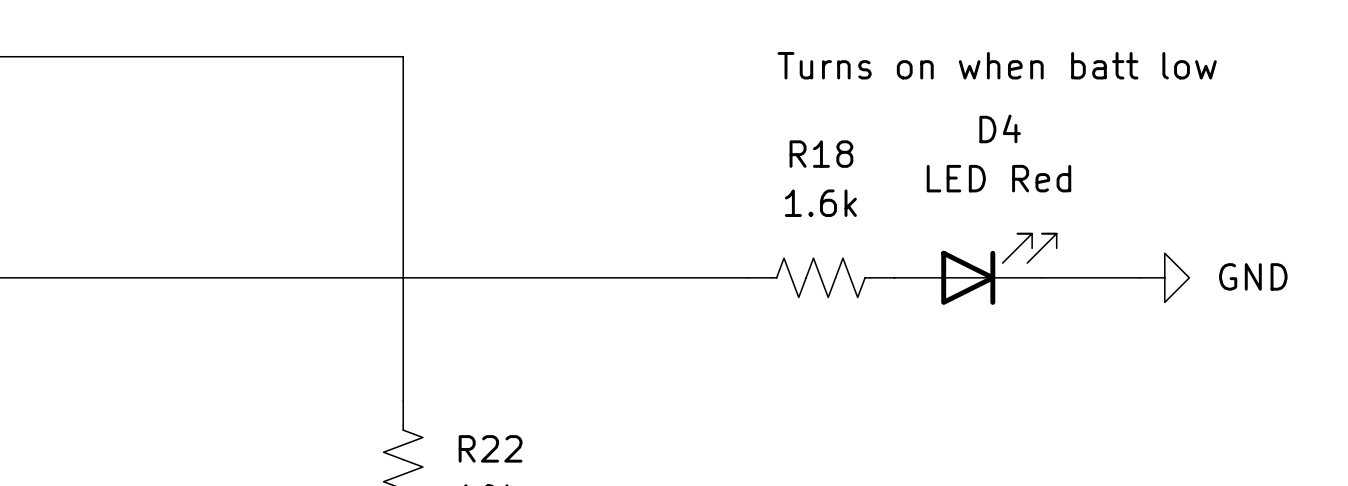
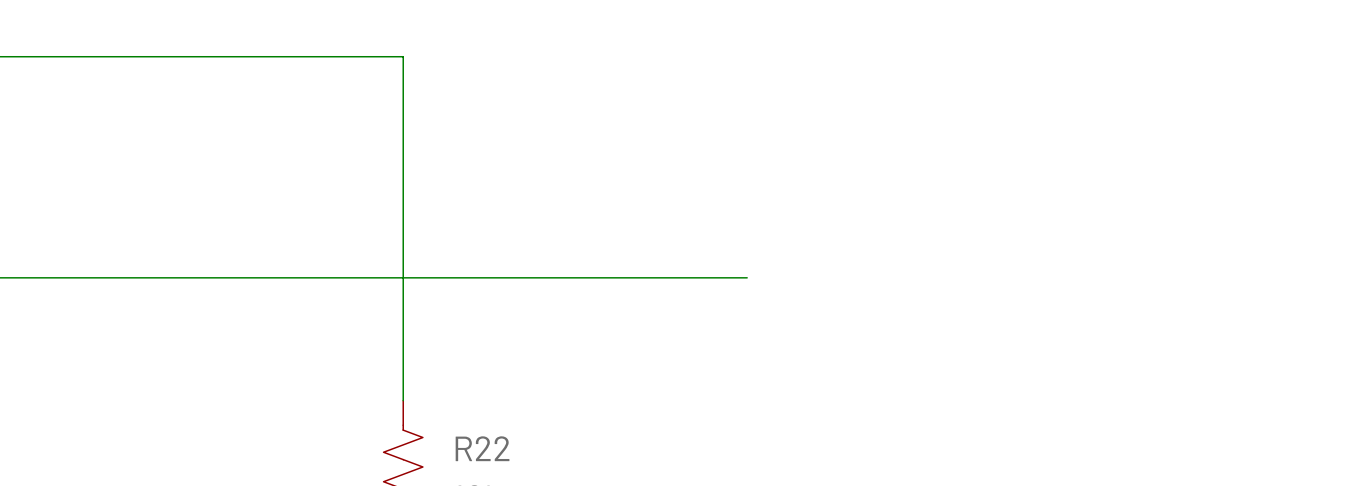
text: Turns on when batt low (997, 65) -> none
D4: LED Red (975, 269) -> none
R18: 1.6k (820, 277) -> none
wire: (1041, 277) (1140, 277) -> none
power symbol: GND (1164, 277) -> none

